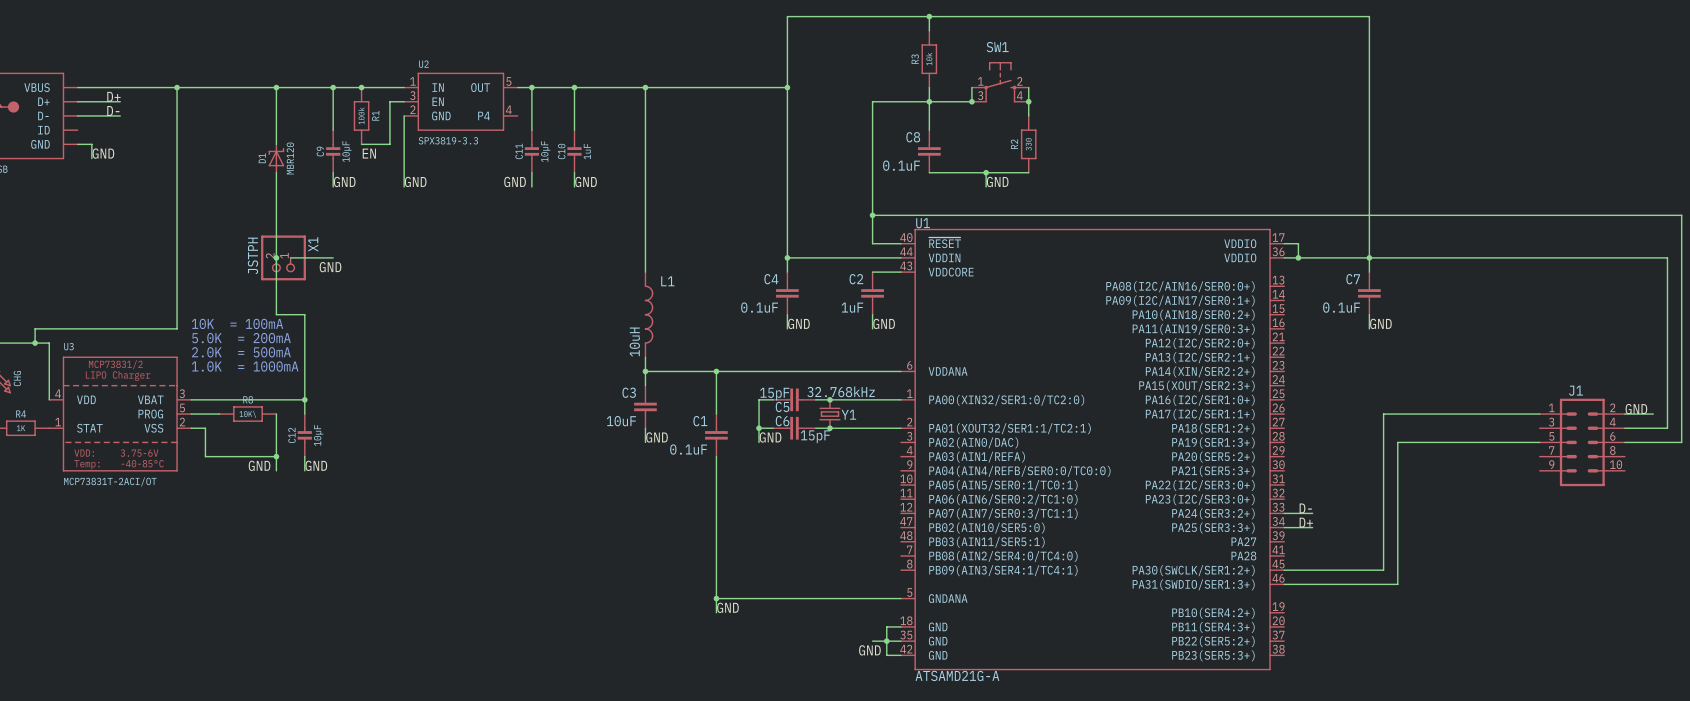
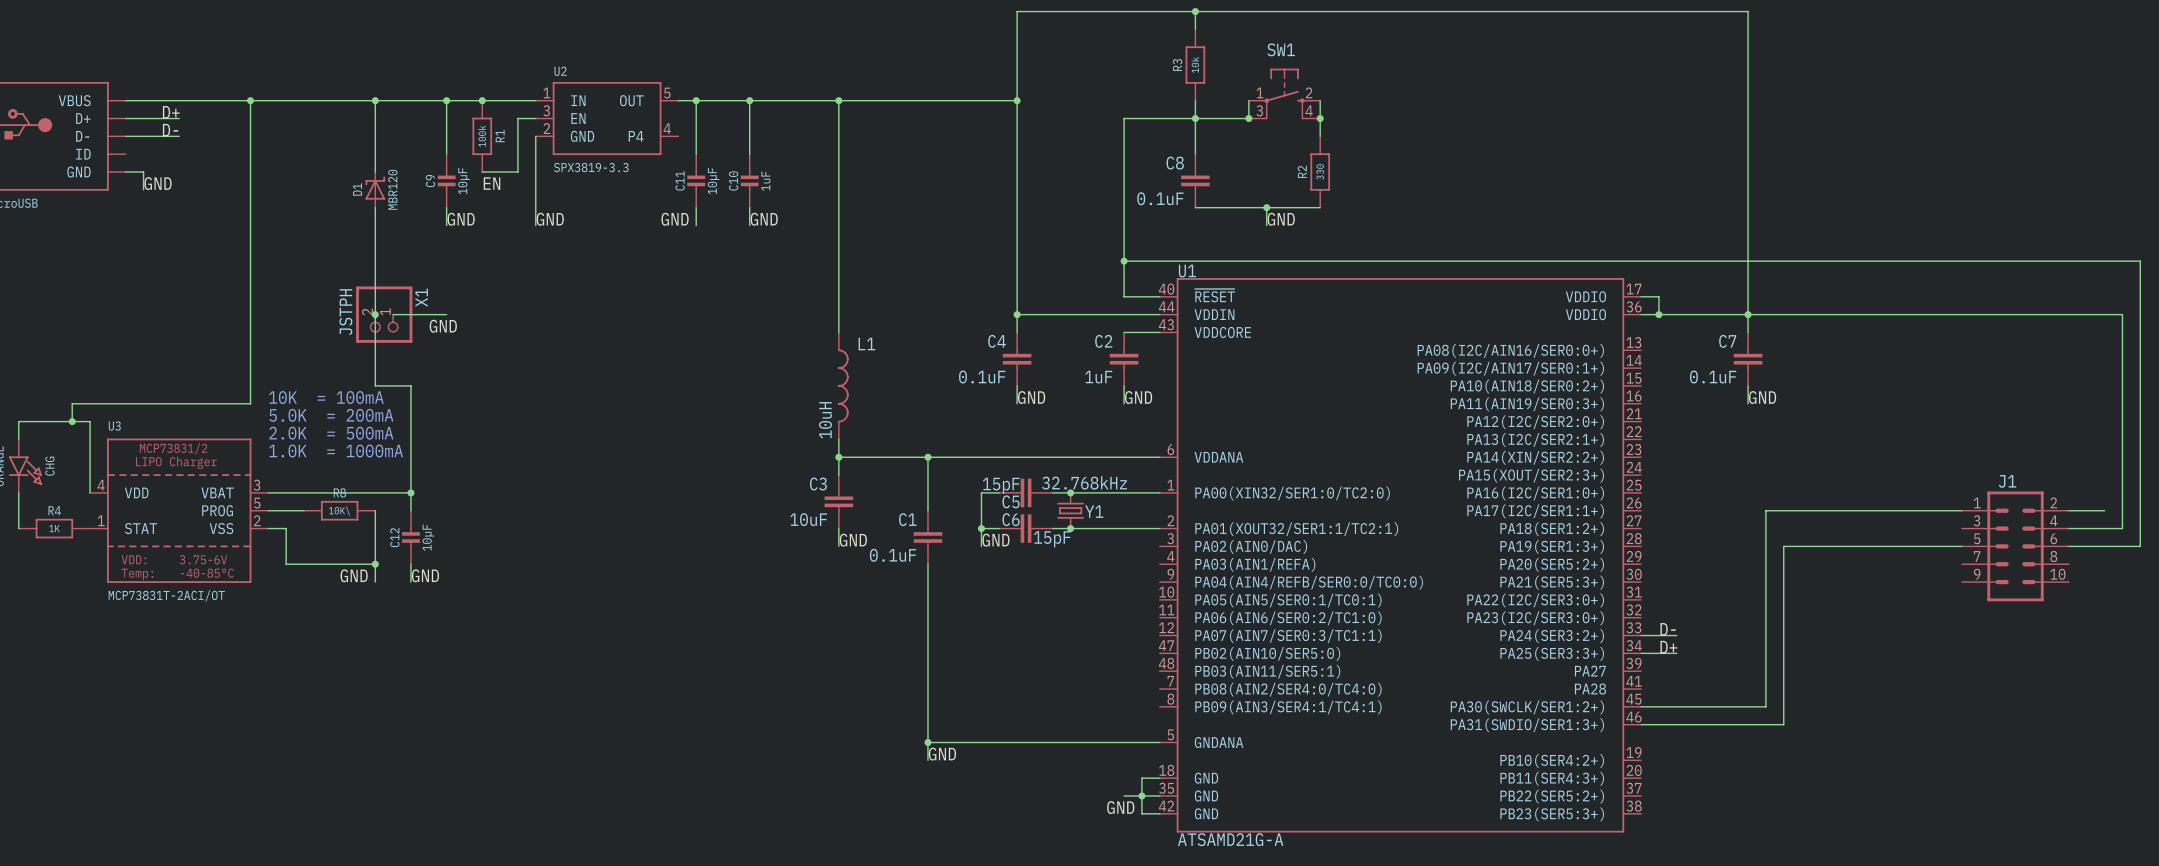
label: GND (1636, 409) -> none

